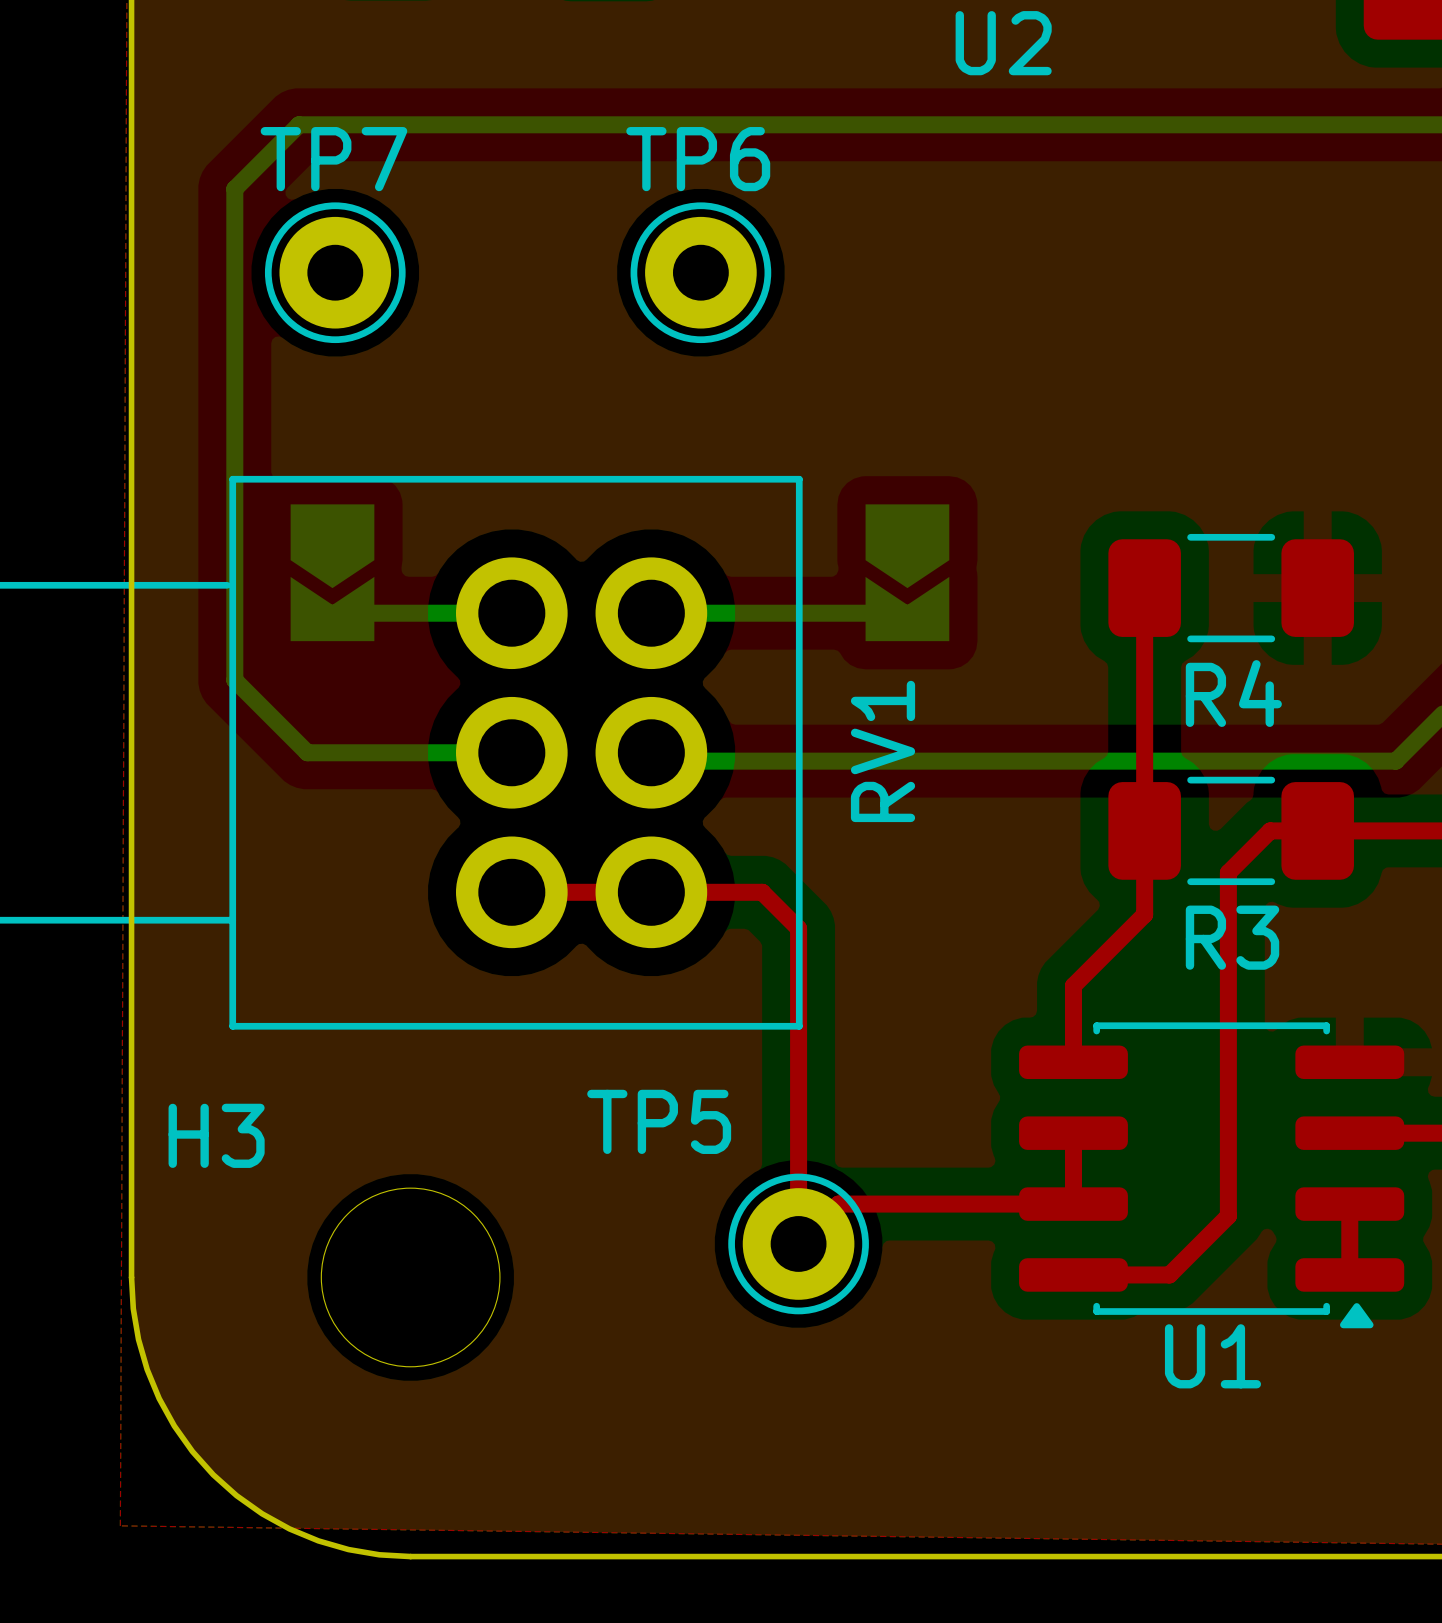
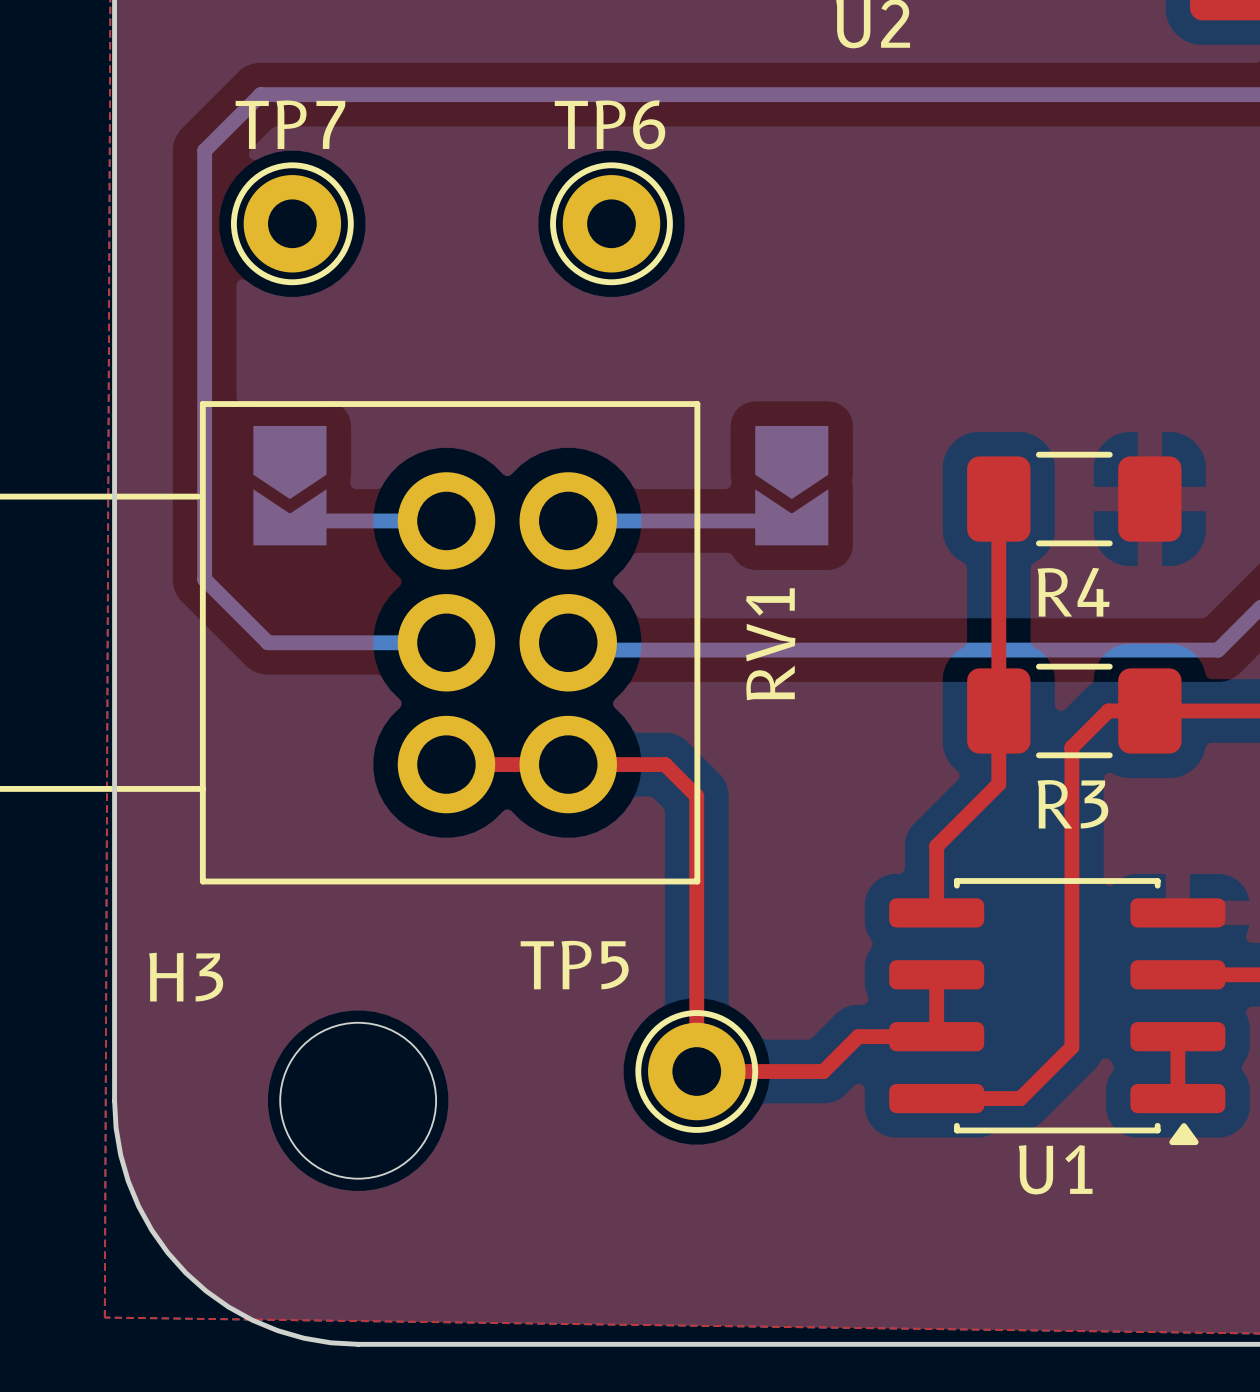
top track: (983, 1204) (838, 1204) (798, 1243) -> (858, 1036) (823, 1071) (696, 1071)

